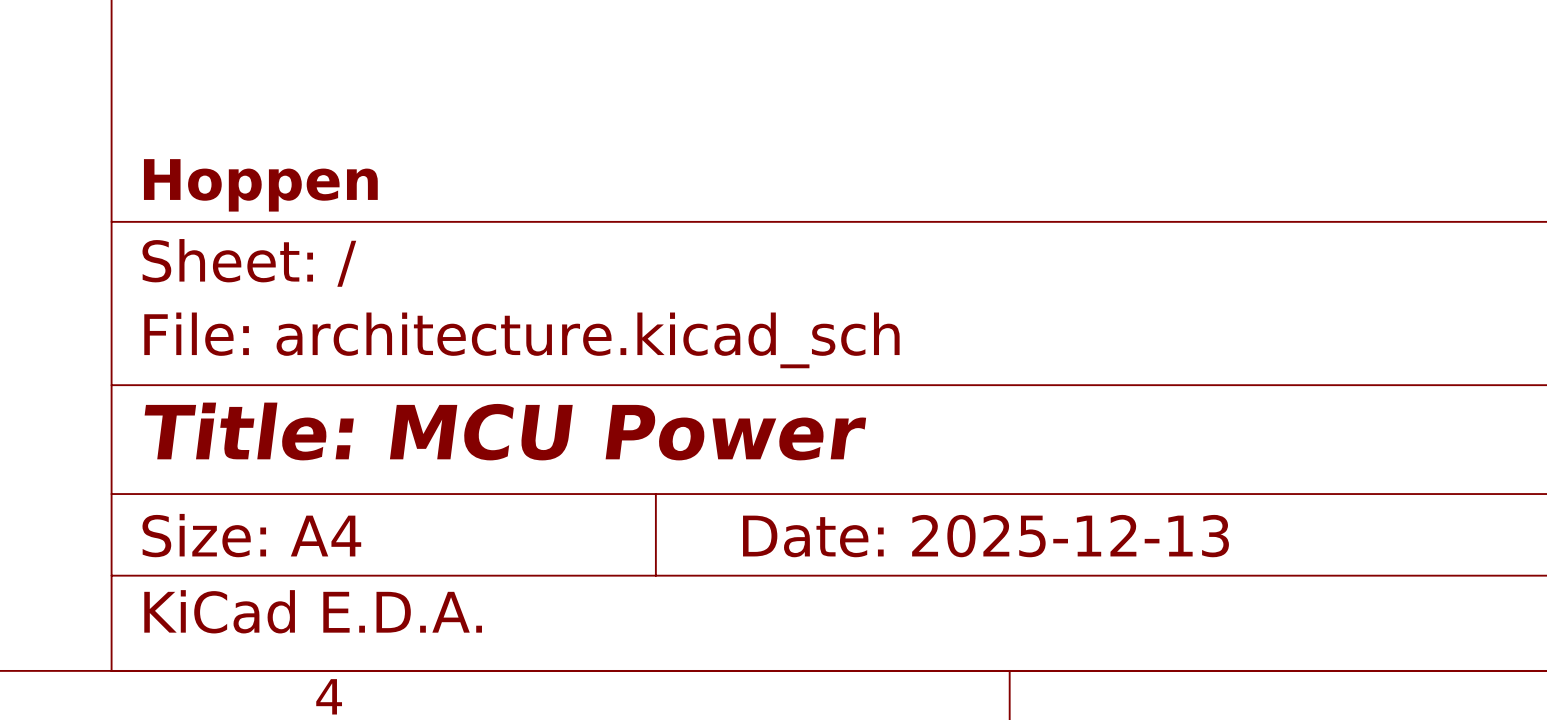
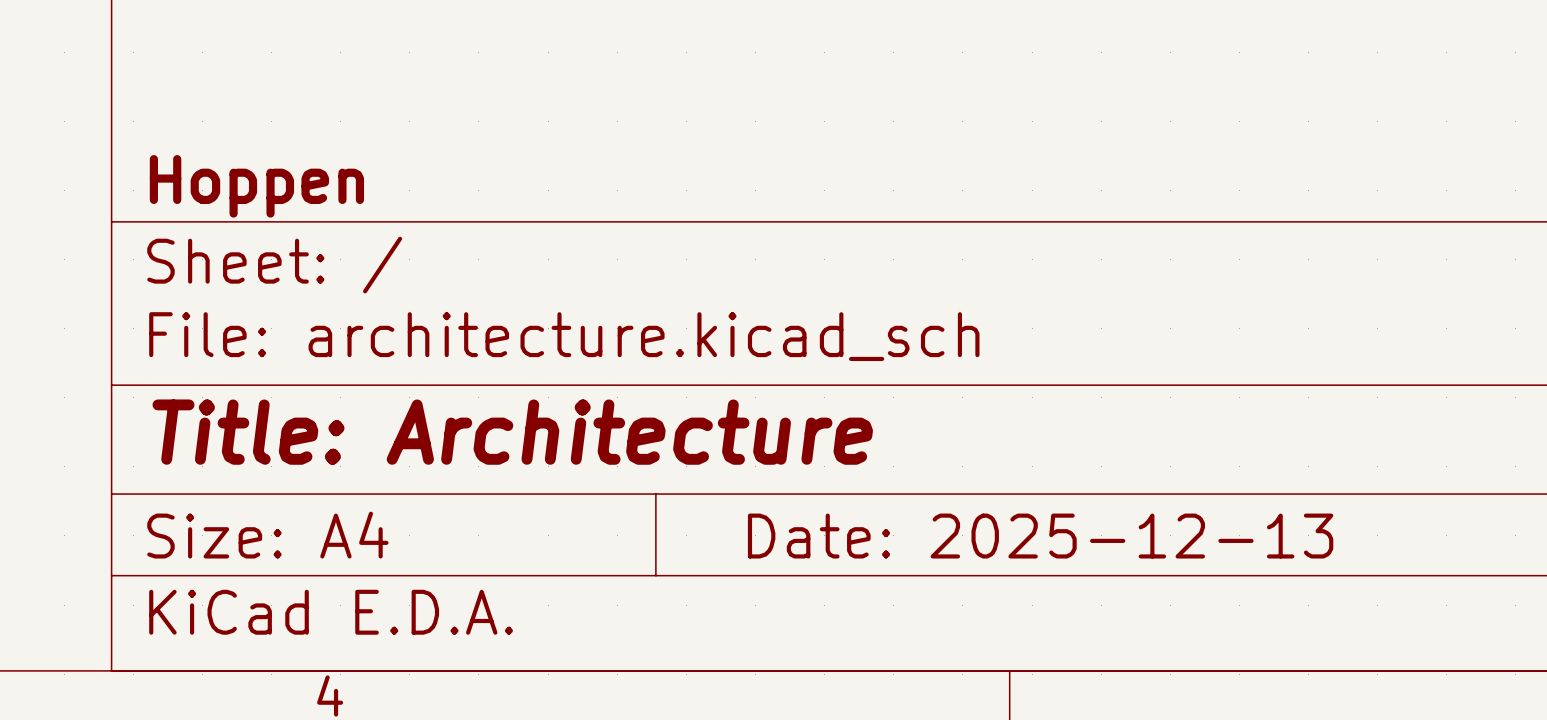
title block: Title: MCU Power (505, 431) -> Title: Architecture (512, 432)

